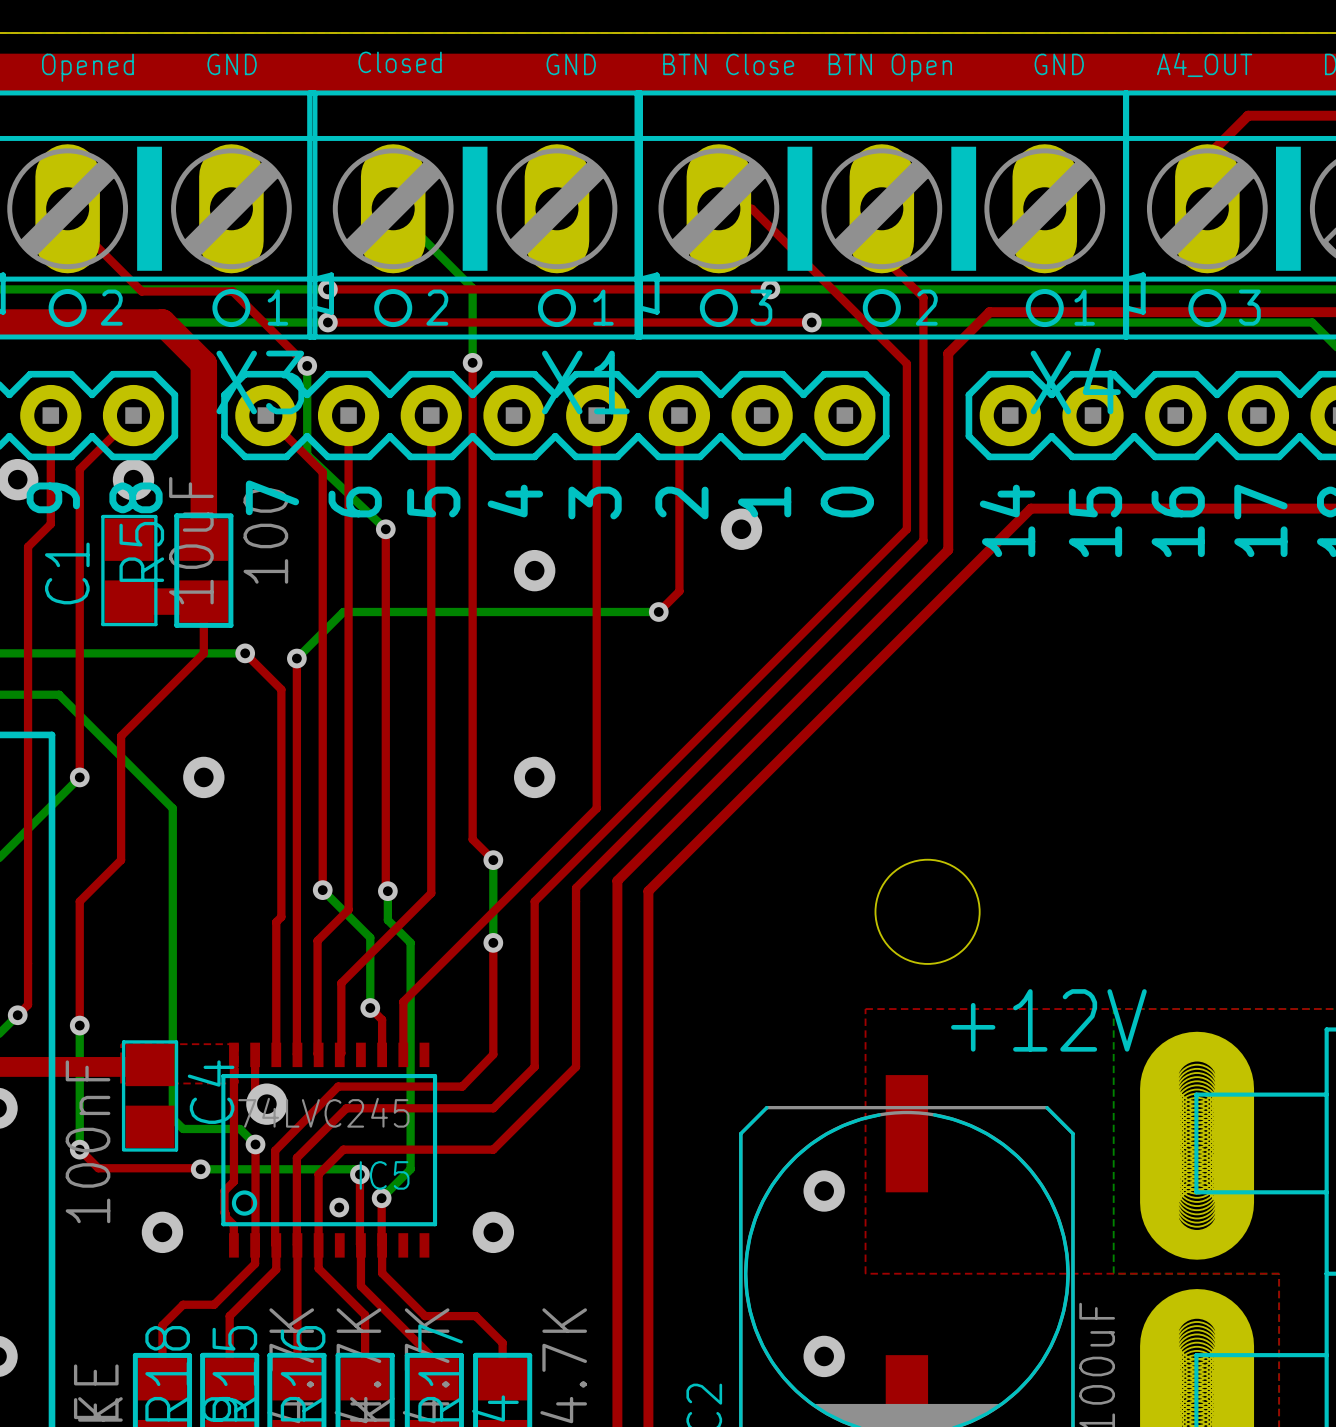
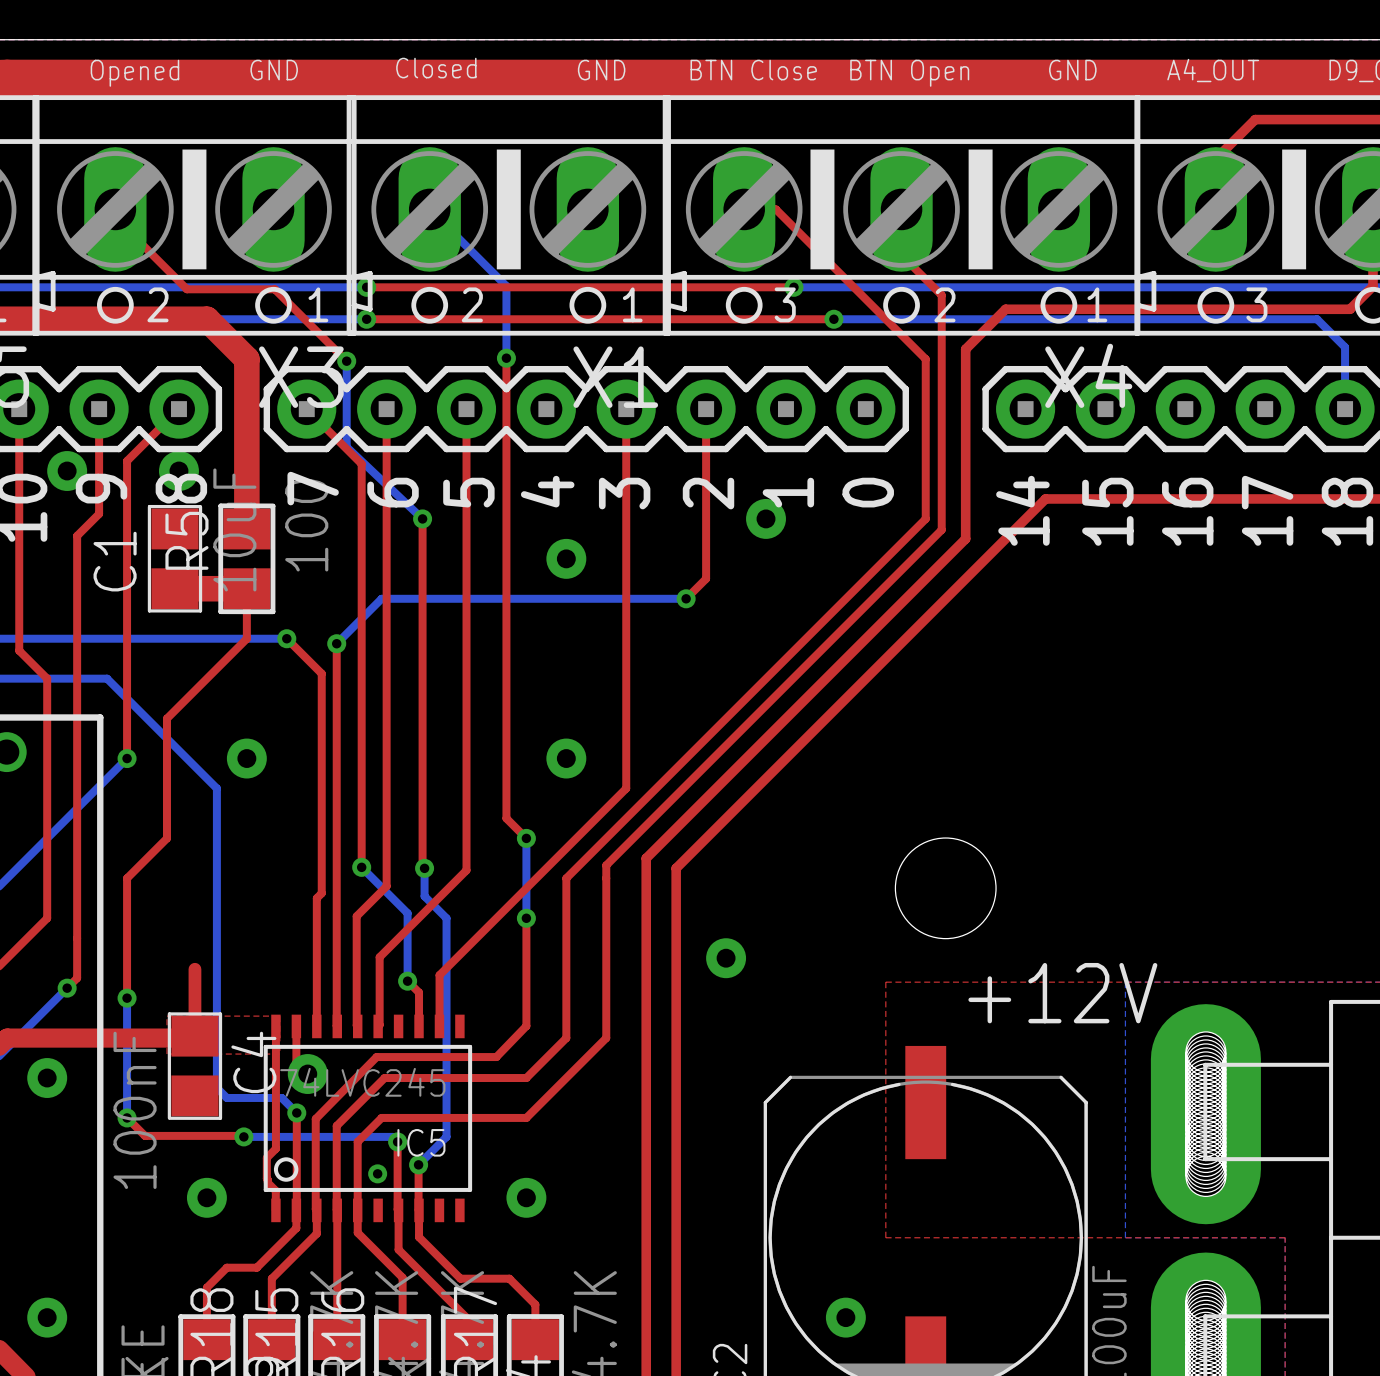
via: none -> (726, 958)
top track: none -> (194, 969) (194, 1036)
via: (824, 1191) -> none

